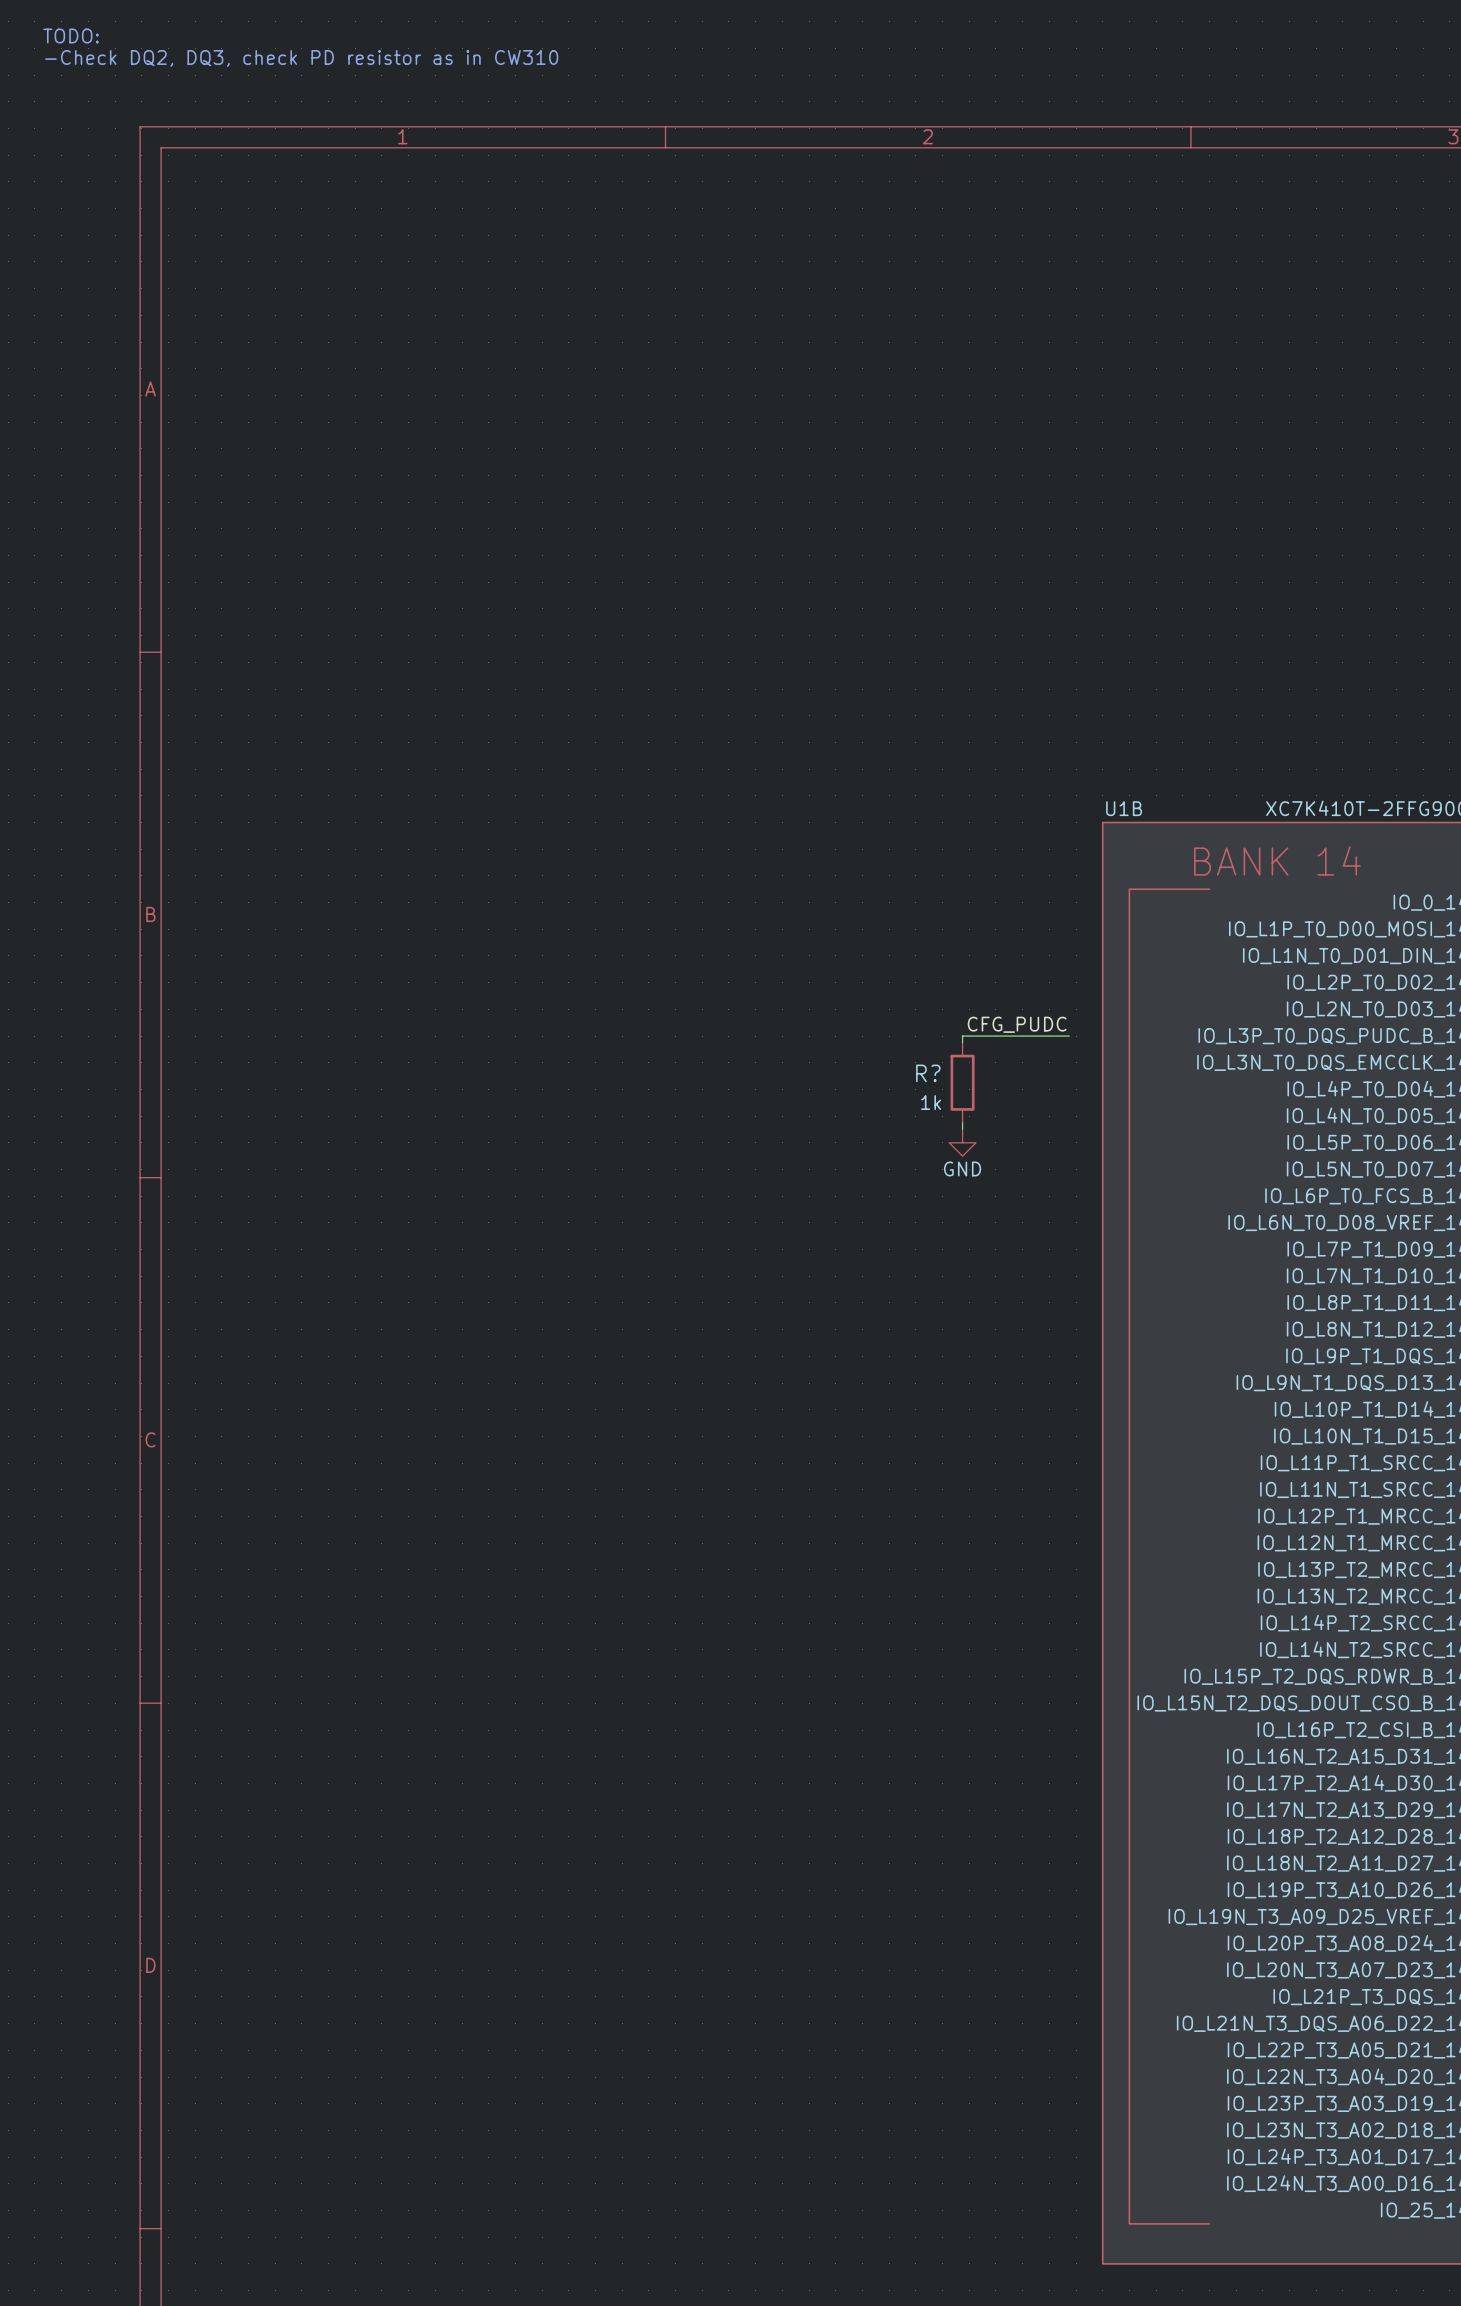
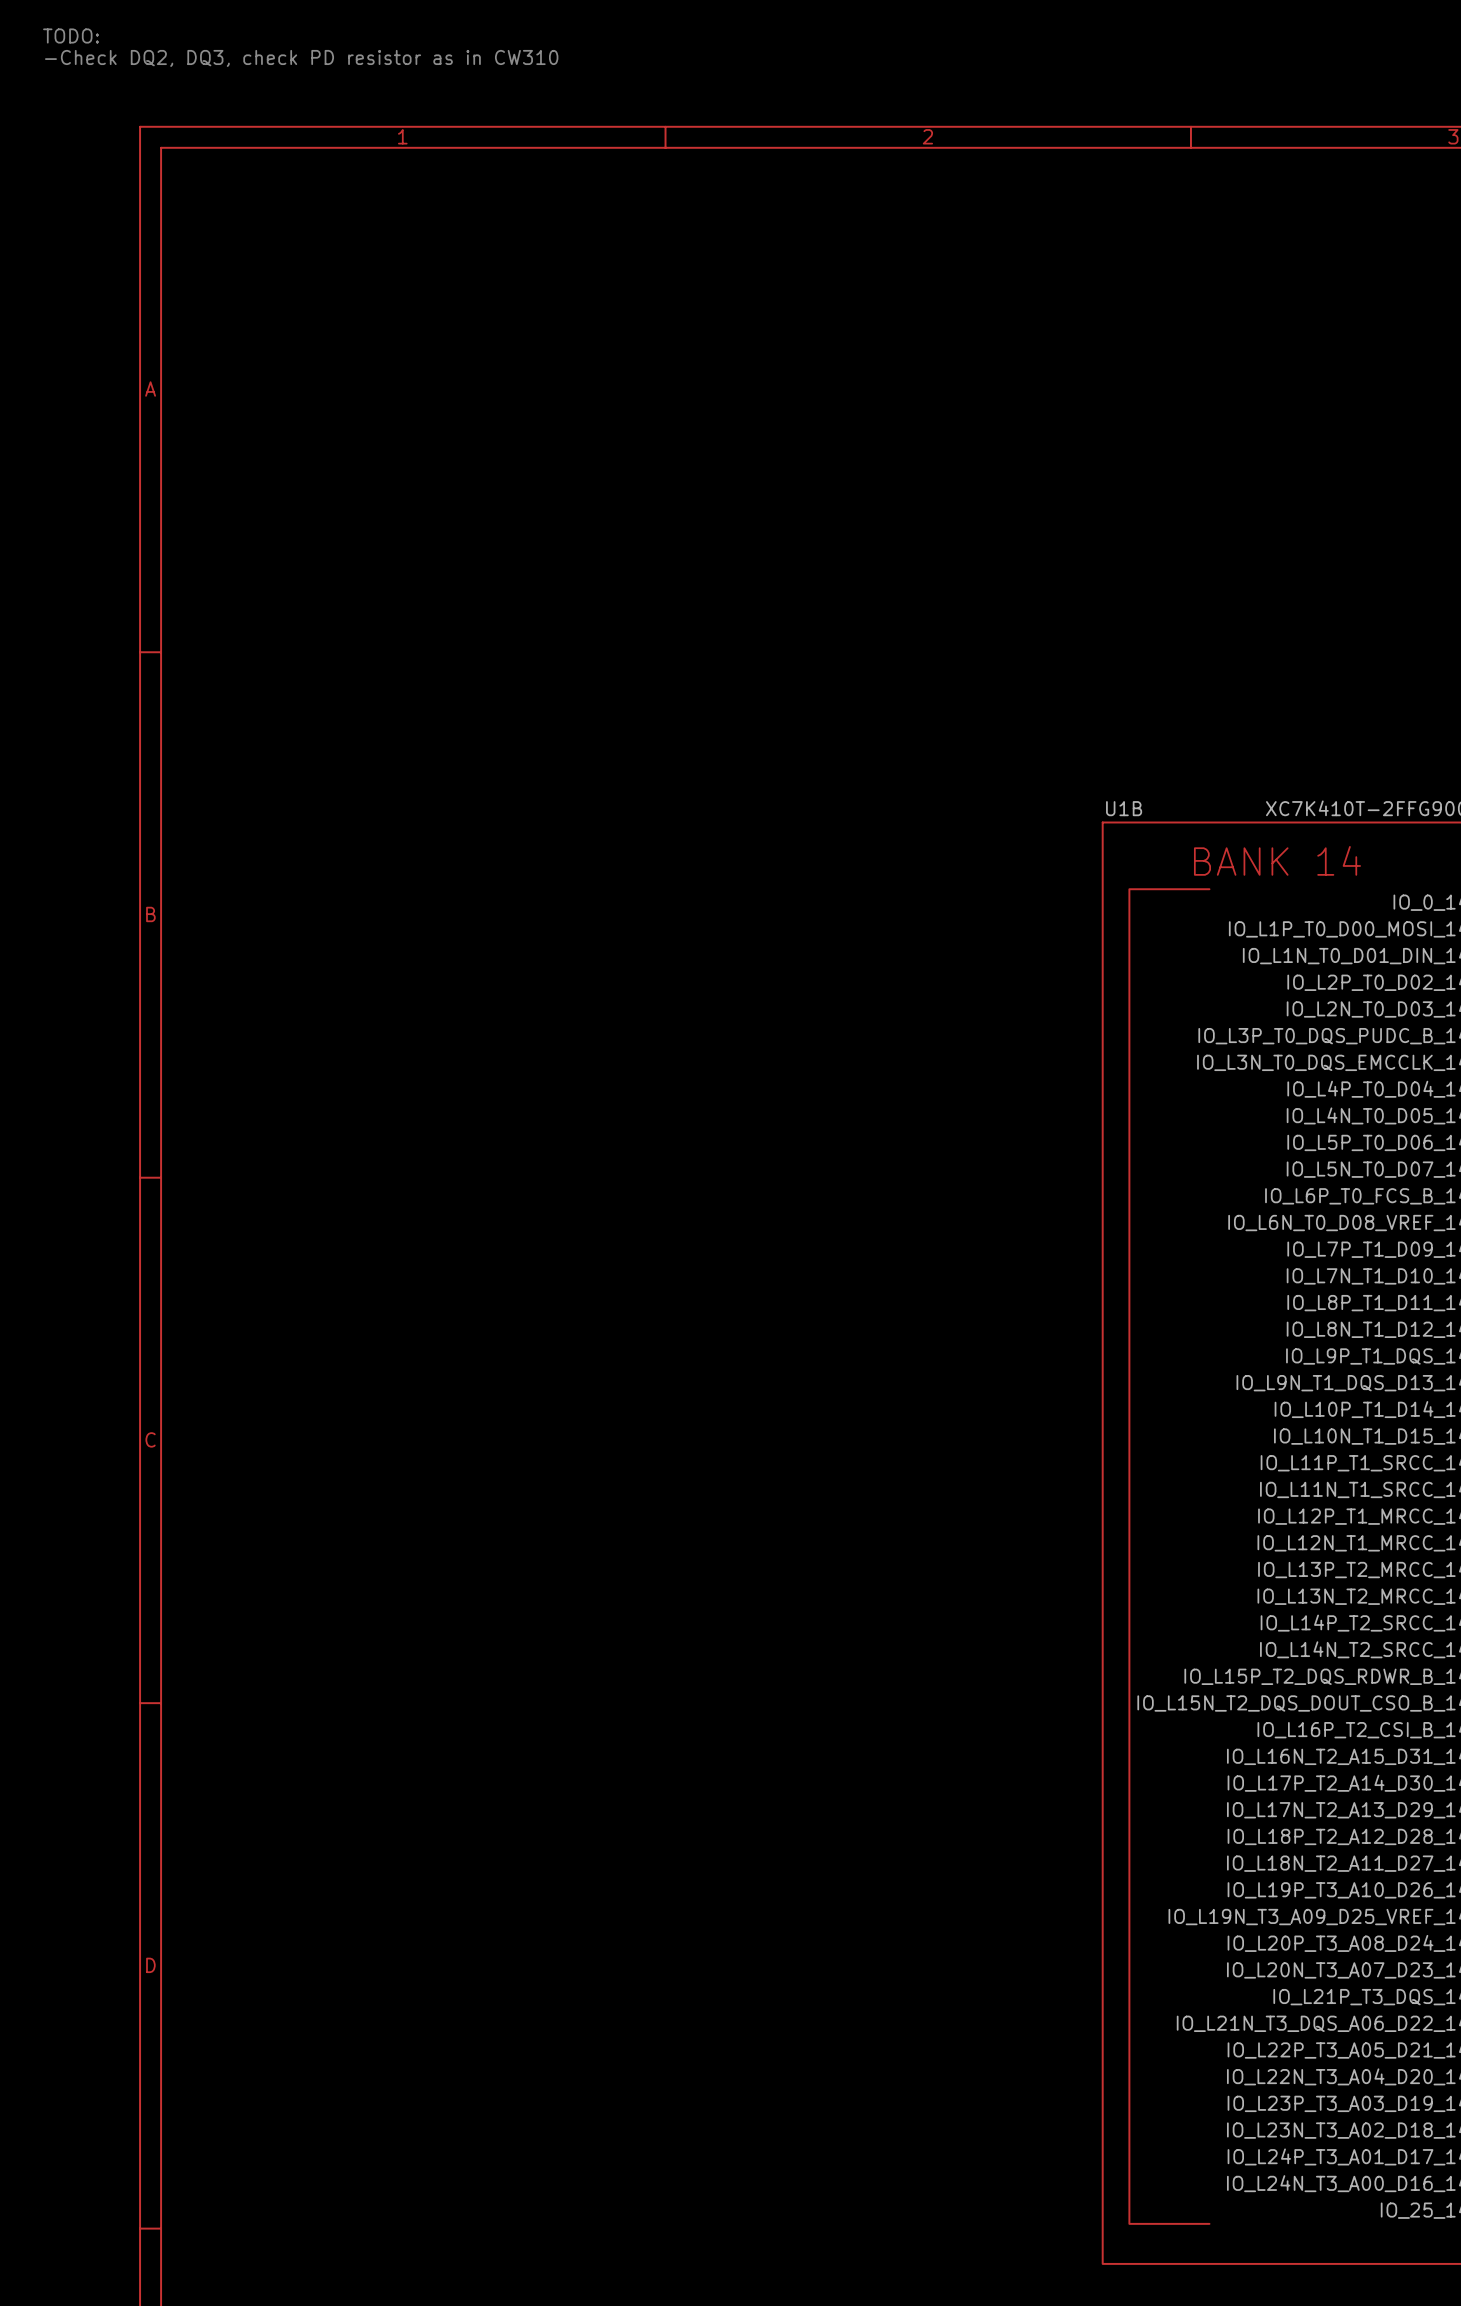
label: CFG_PUDC (1017, 1024) -> none
wire: (1069, 1036) (962, 1036) (962, 1042) -> none
R?: (962, 1082) -> none
wire: (962, 1122) (962, 1129) -> none
power symbol: GND (962, 1142) -> none

